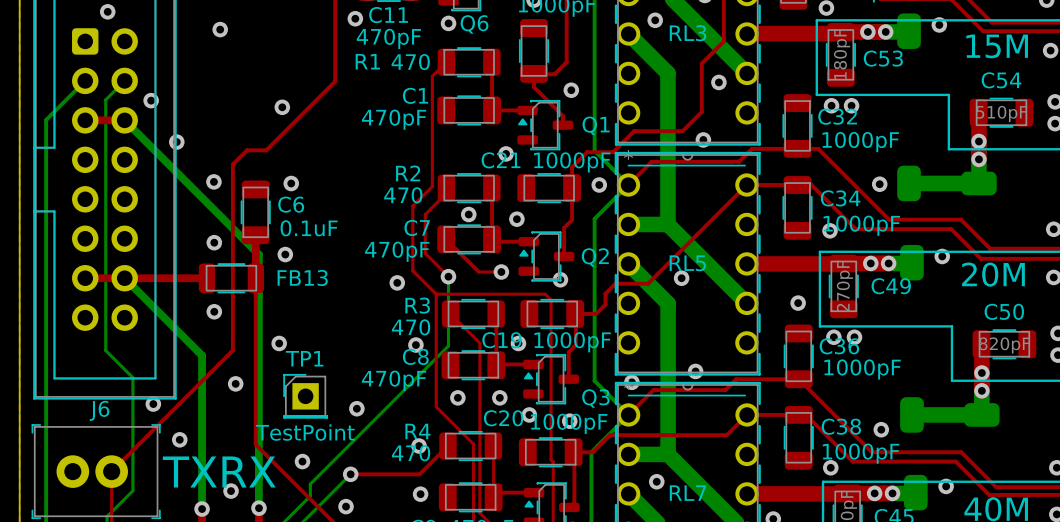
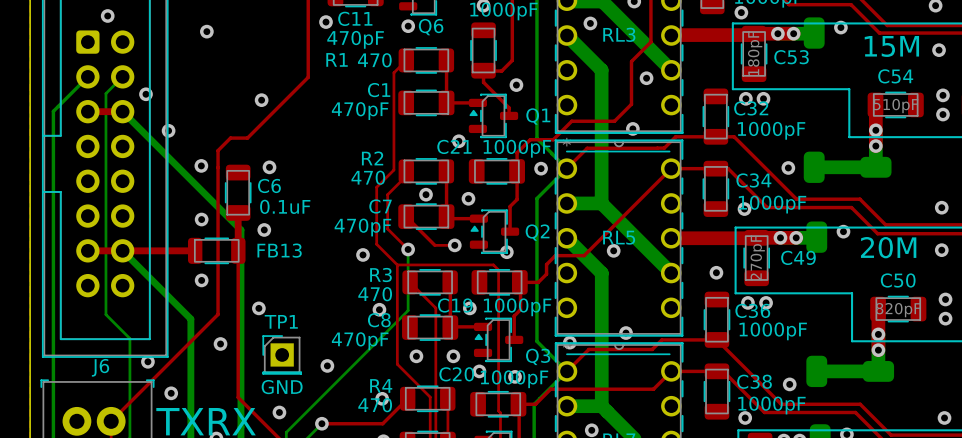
TP1 value: TestPoint (305, 432) -> GND (282, 387)

